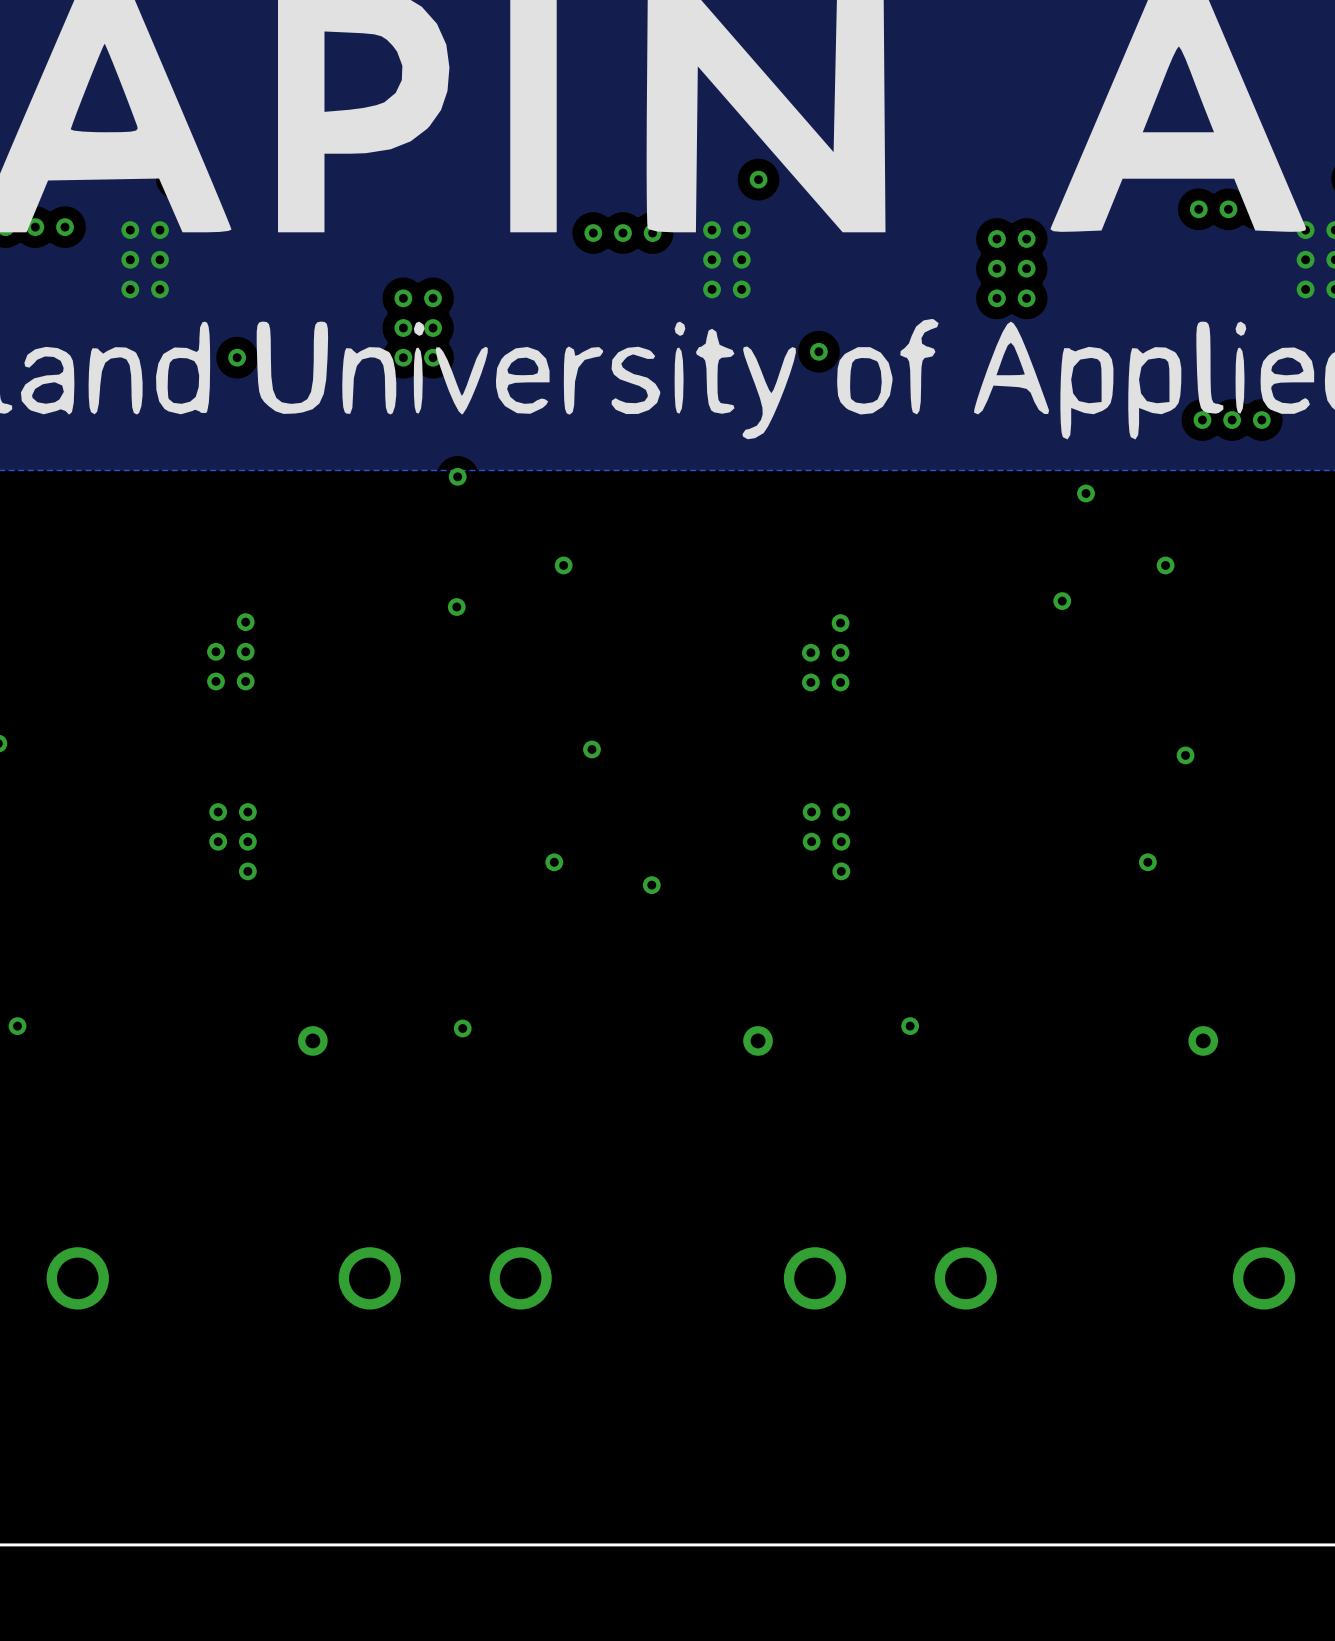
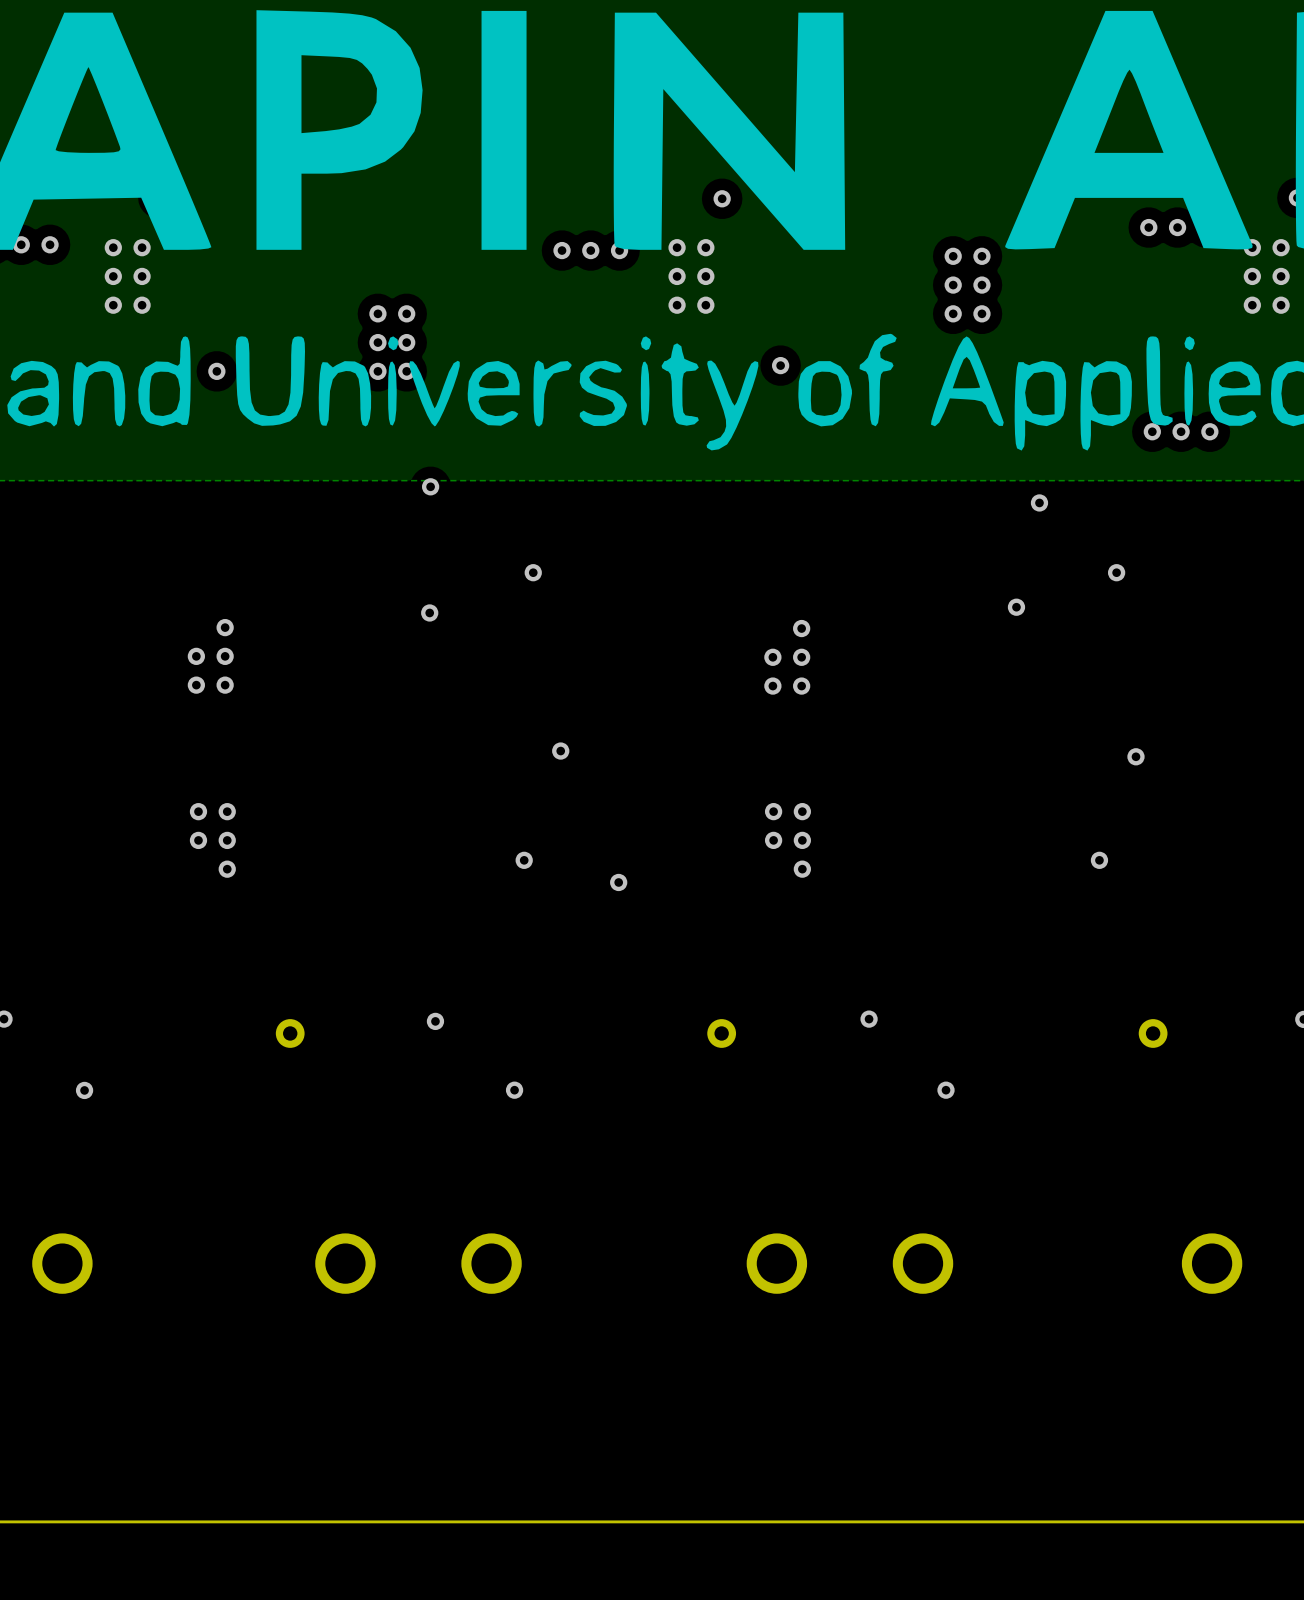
via: none -> (84, 1090)
via: none -> (514, 1090)
via: none -> (946, 1090)

